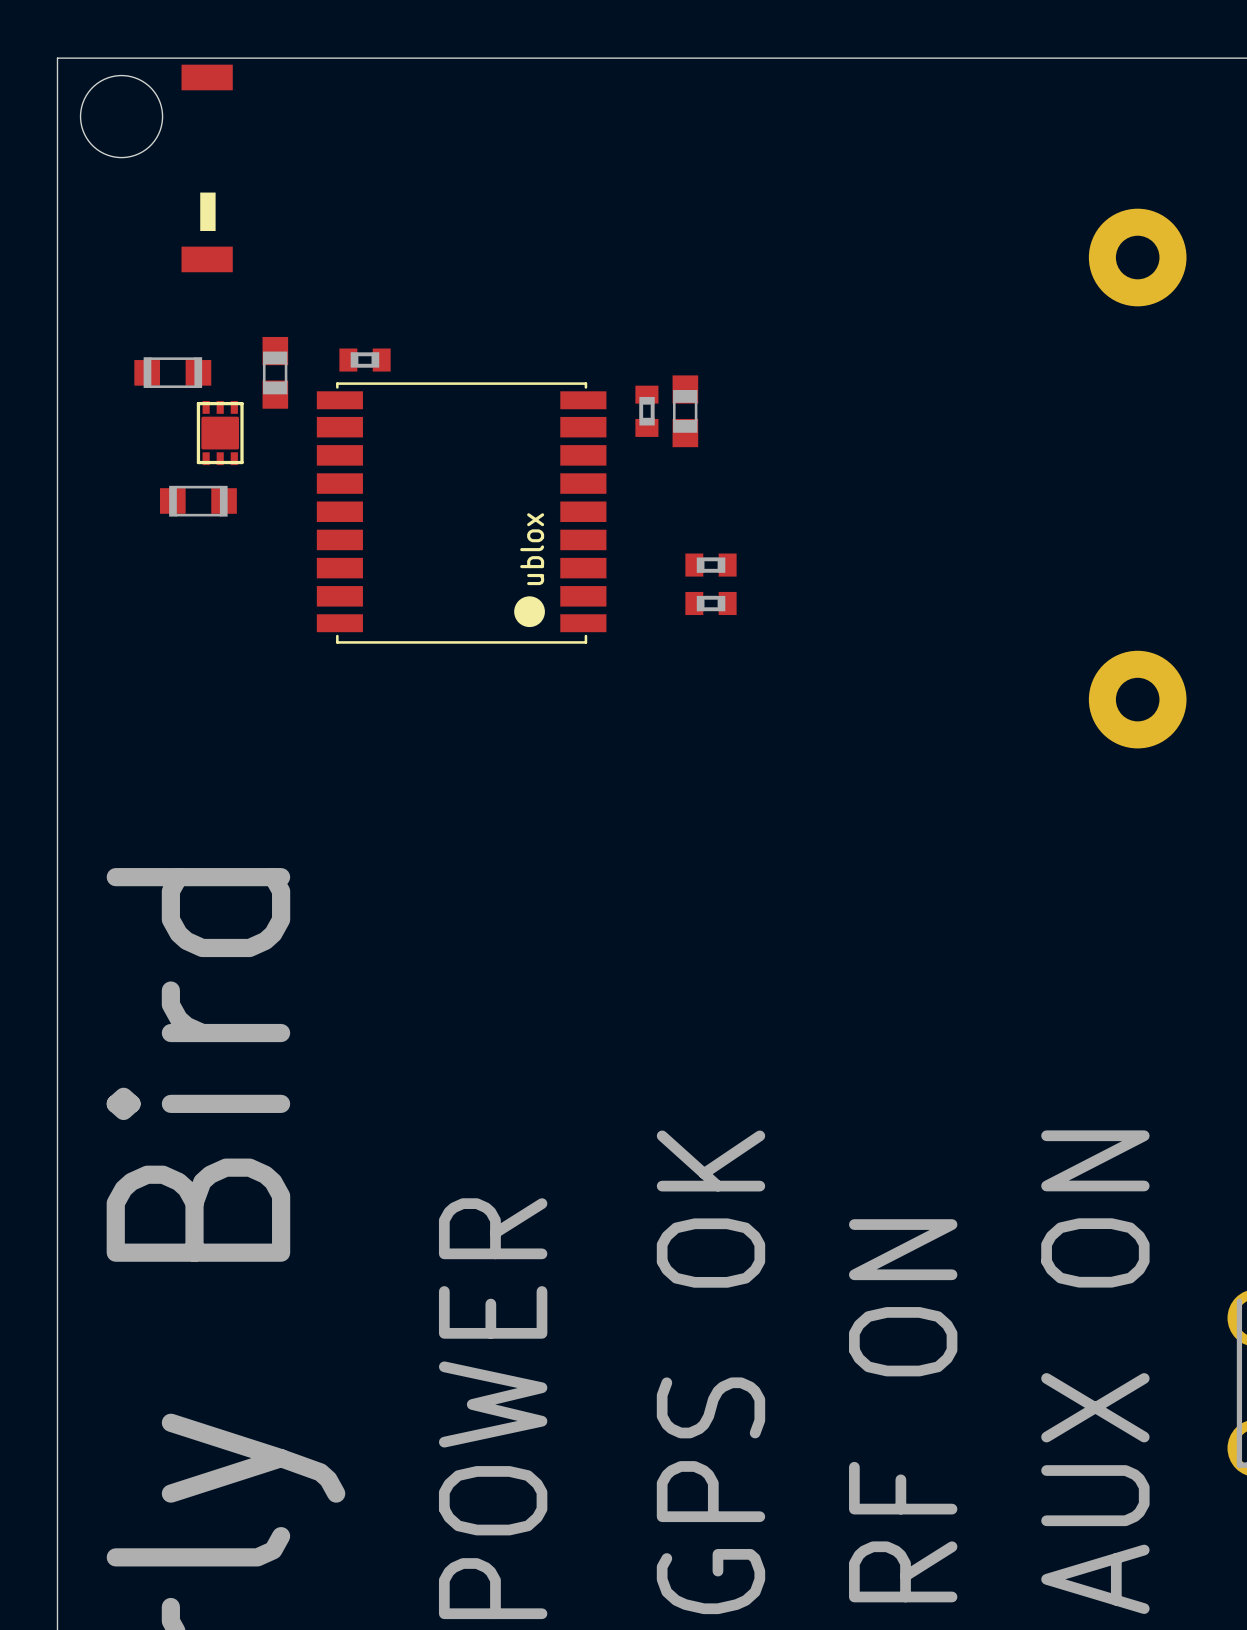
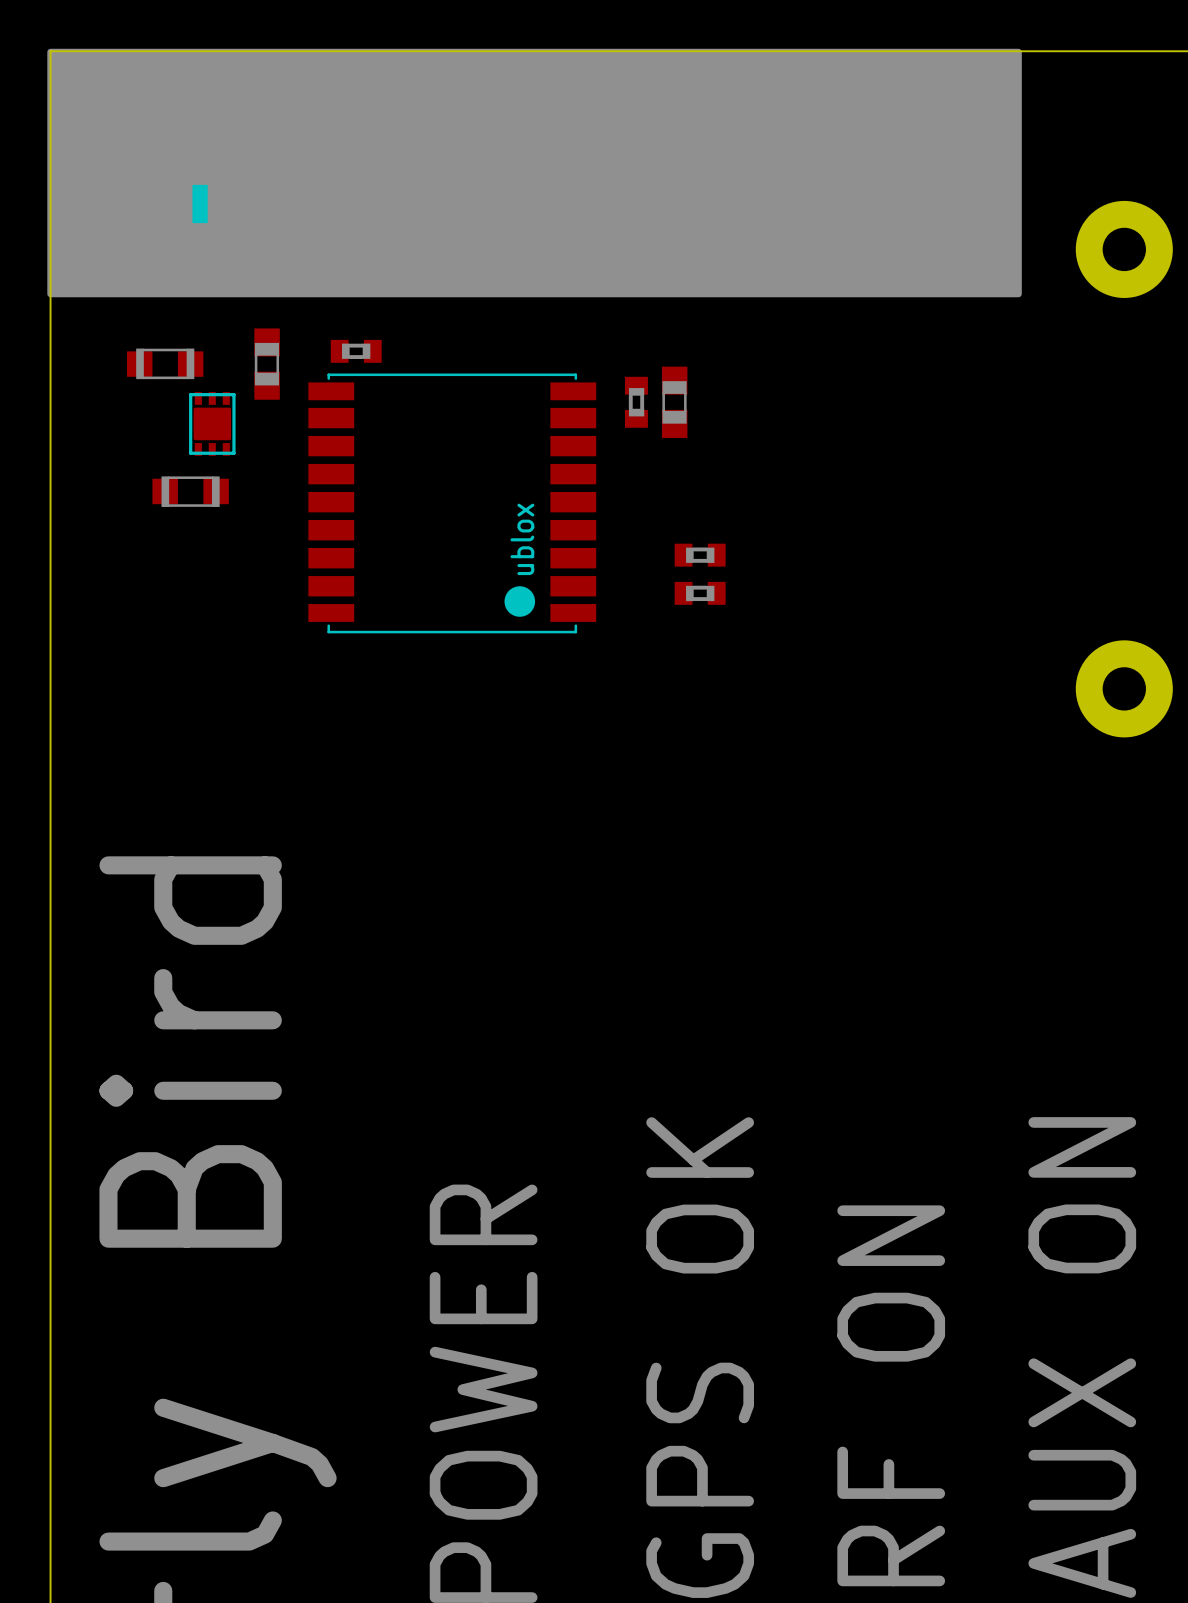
drawing: none -> [47, 48, 1022, 298]

